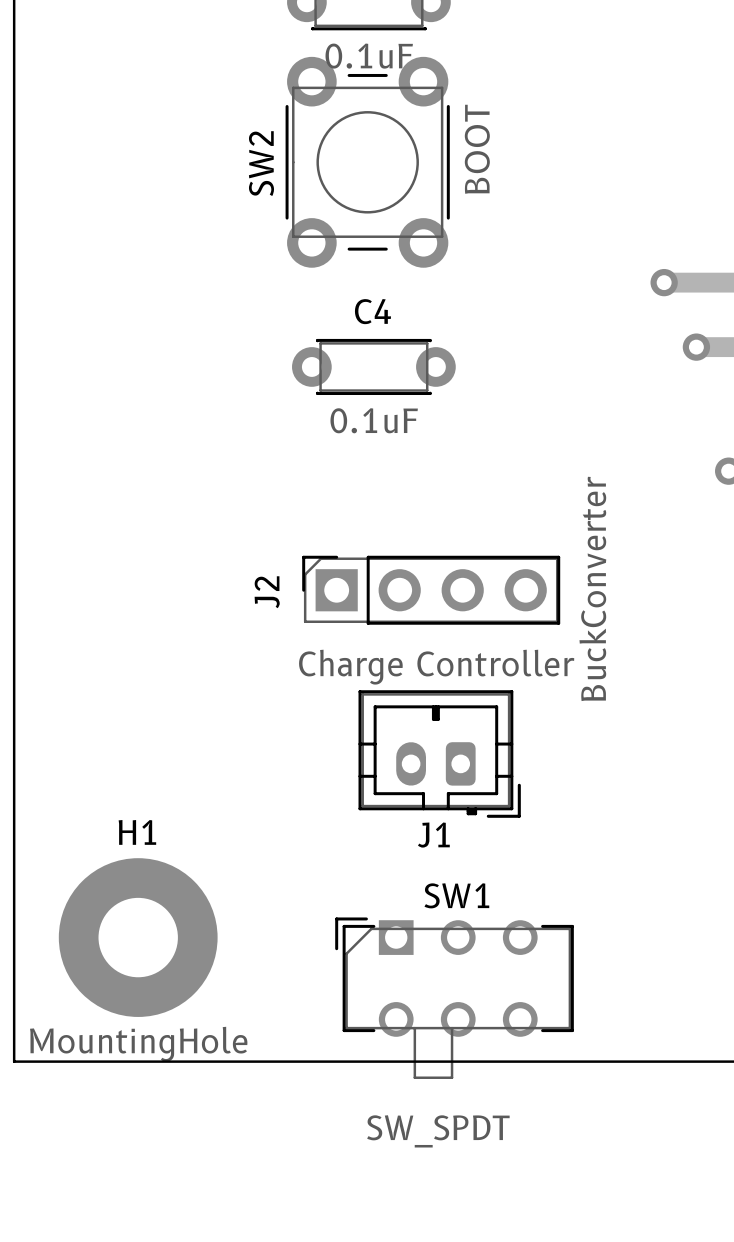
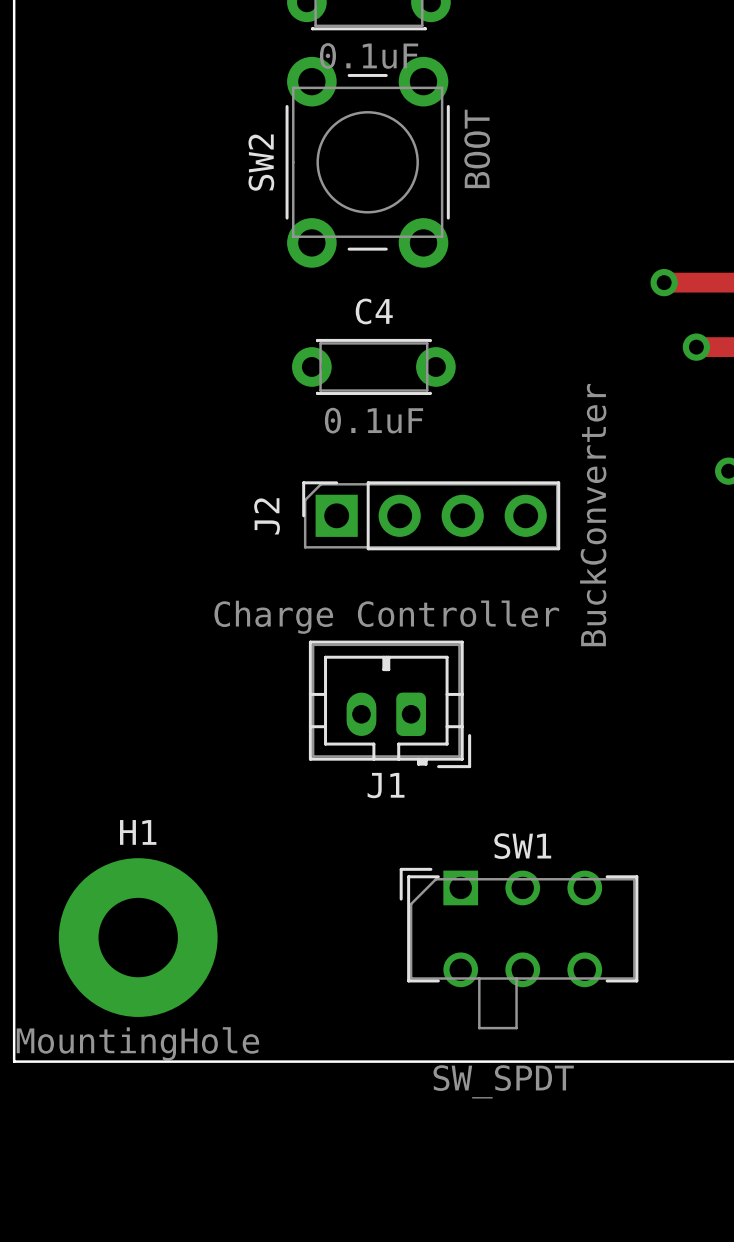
J2 position: (431, 590) -> (431, 515)
J1 position: (439, 753) -> (390, 704)
SW1 position: (454, 998) -> (519, 948)

